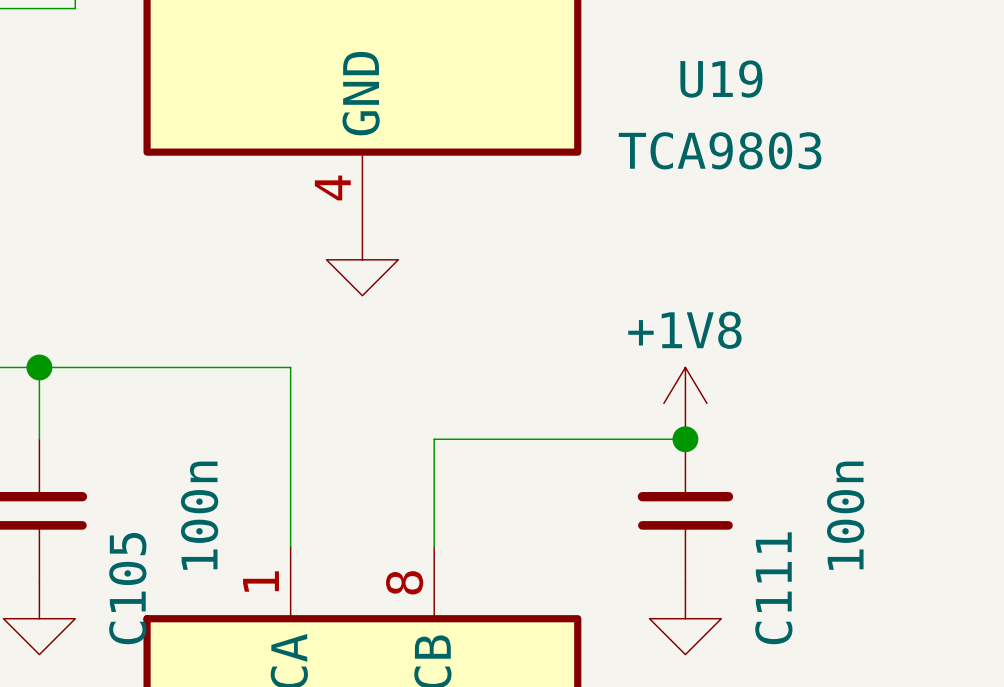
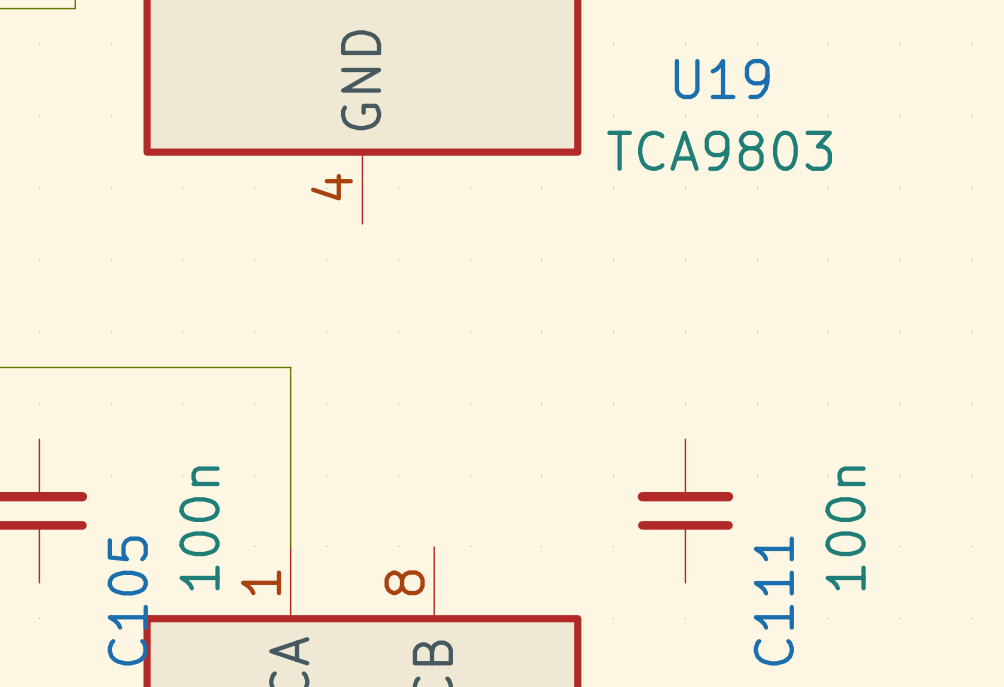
power symbol: (362, 259) -> none
wire: (39, 367) (39, 439) -> none
junction: (39, 367) -> none
power symbol: +1V8 (685, 403) -> none
wire: (685, 439) (434, 439) (434, 546) -> none
junction: (685, 439) -> none
power symbol: (39, 618) -> none
power symbol: (685, 618) -> none

